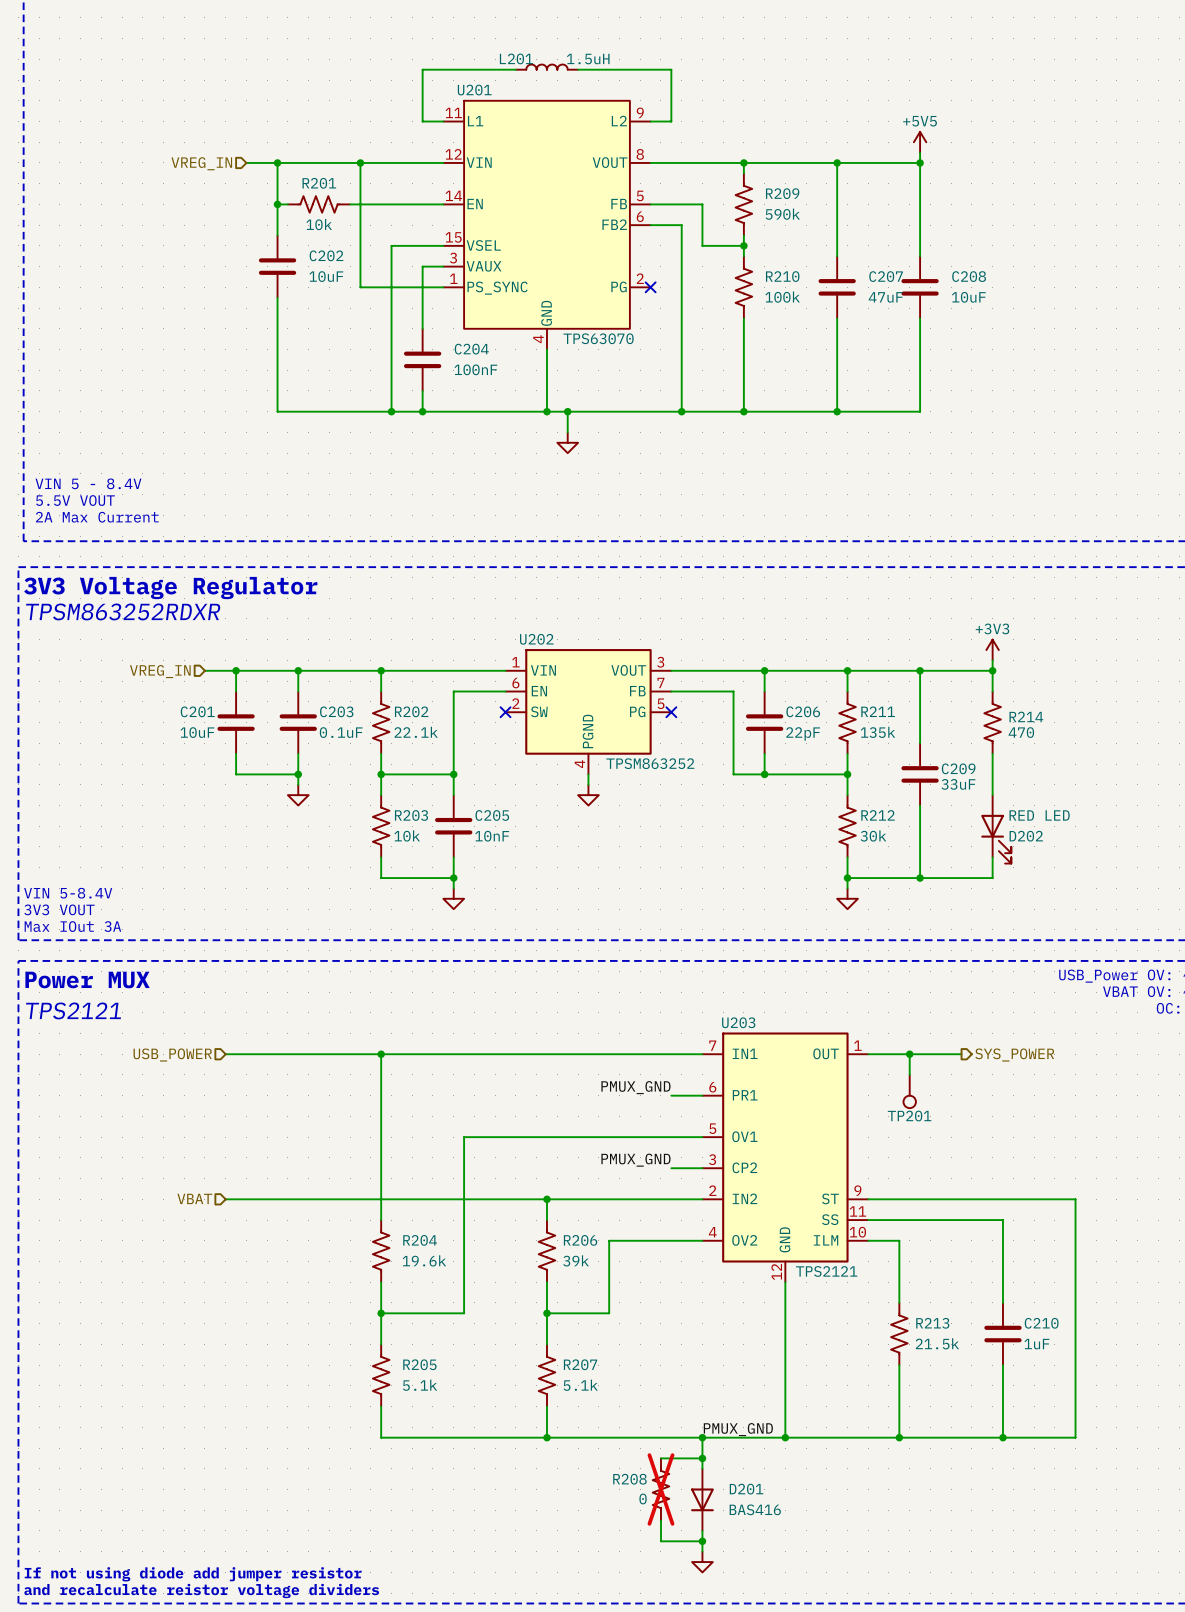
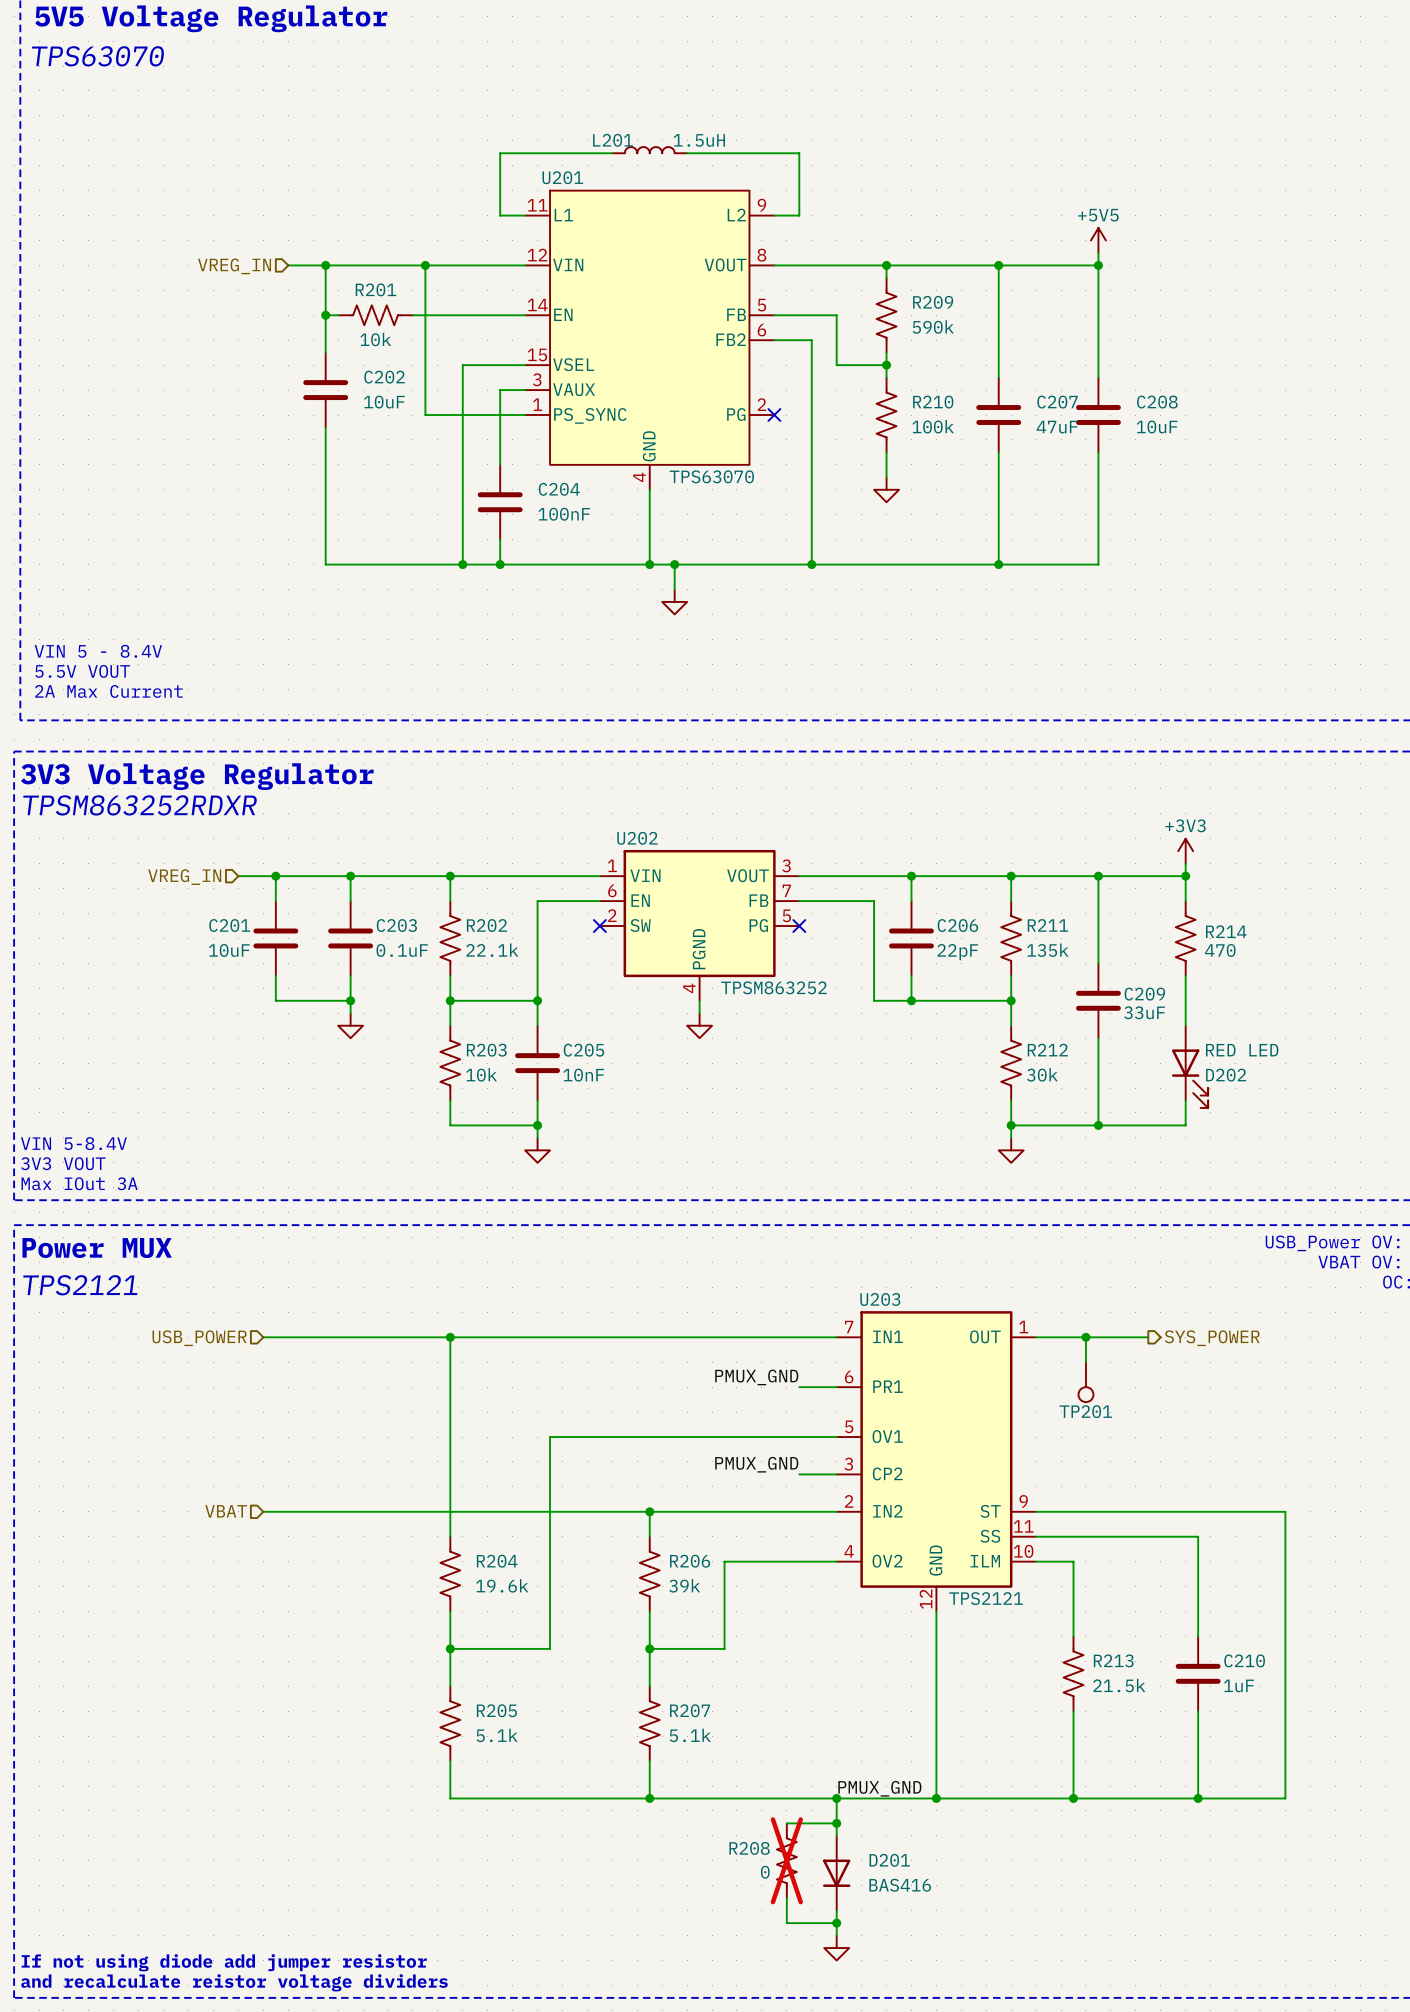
wire: (743, 339) (743, 411) -> none
power symbol: none -> (886, 489)
junction: (743, 411) -> none

